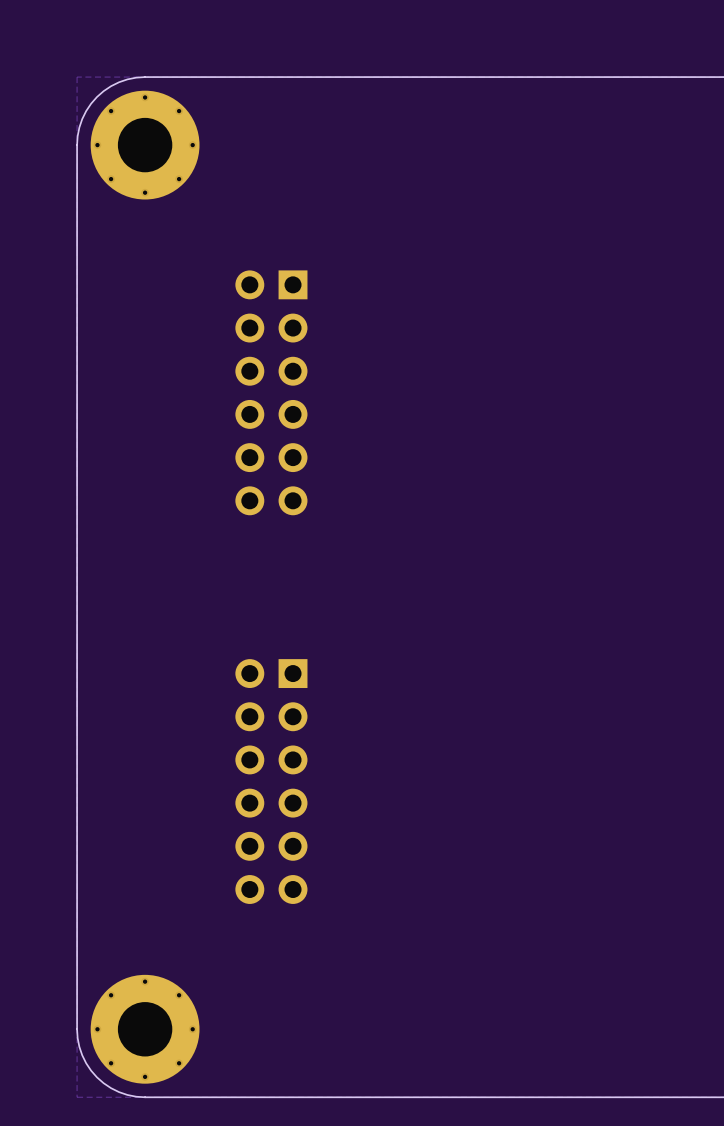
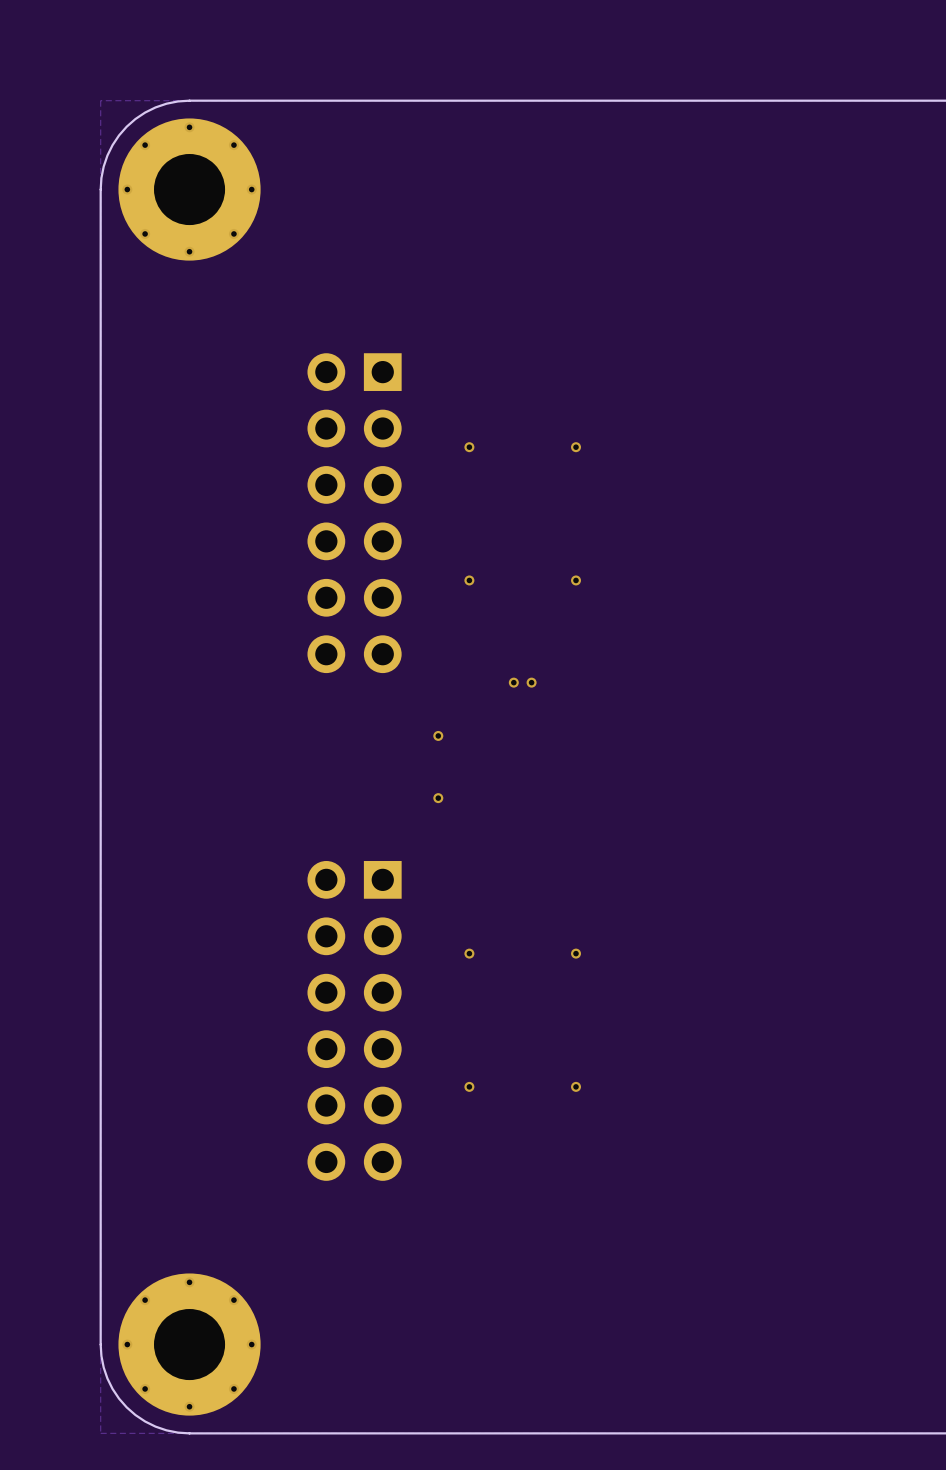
via: none -> (469, 447)
via: none -> (576, 447)
via: none -> (469, 580)
via: none -> (576, 580)
via: none -> (513, 682)
via: none -> (531, 682)
via: none -> (438, 735)
via: none -> (438, 798)
via: none -> (469, 953)
via: none -> (576, 953)
via: none -> (469, 1086)
via: none -> (576, 1086)

